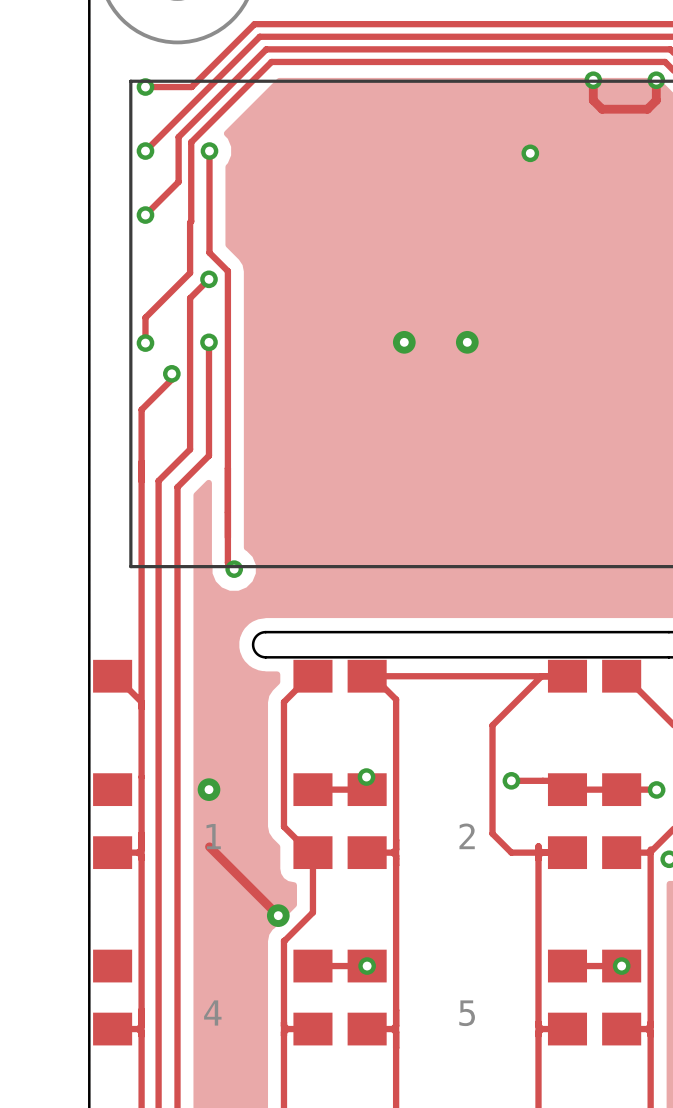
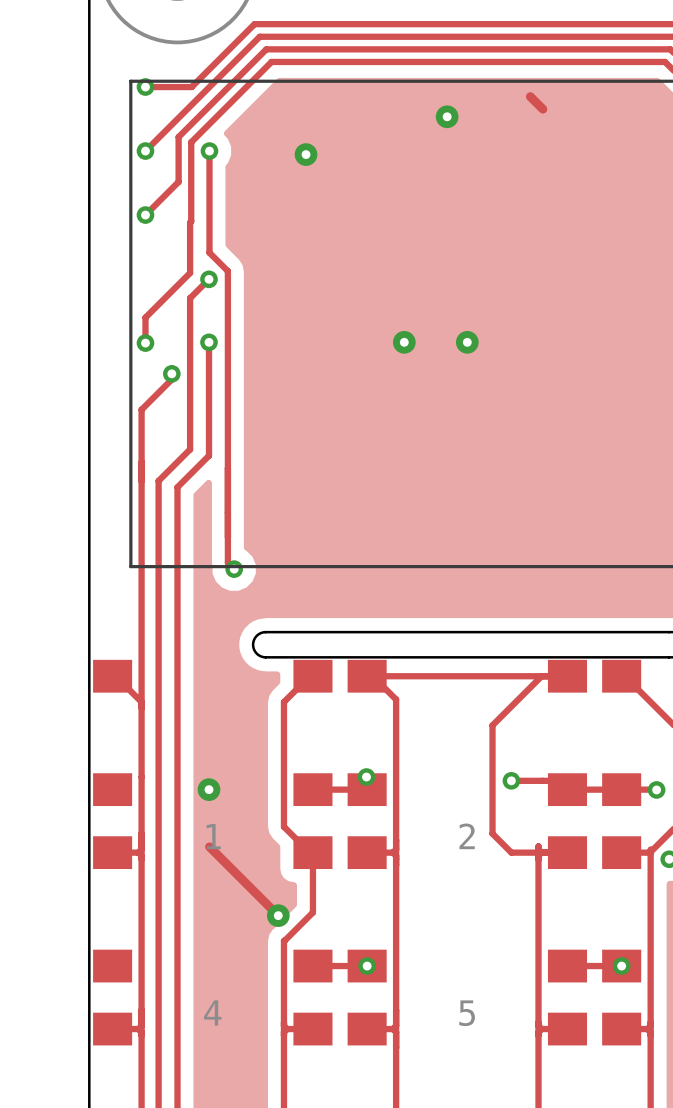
track: (593, 80) (593, 100) (602, 109) (647, 109) (656, 100) (656, 80) -> none
via: (593, 80) -> none
via: (656, 80) -> none
track: none -> (530, 96) (542, 109)
via: none -> (447, 116)
via: (530, 153) -> none
via: none -> (306, 154)

